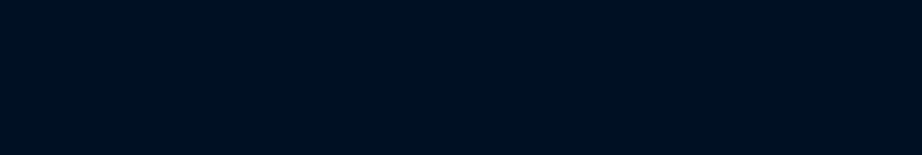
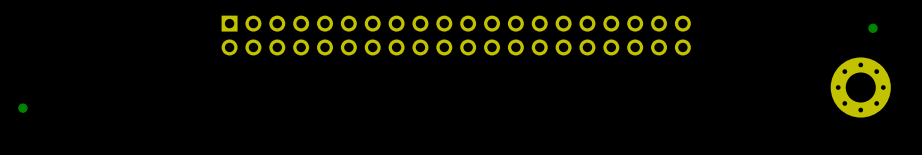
part: none -> (873, 28)
part: none -> (456, 35)
part: none -> (860, 87)
part: none -> (22, 108)

